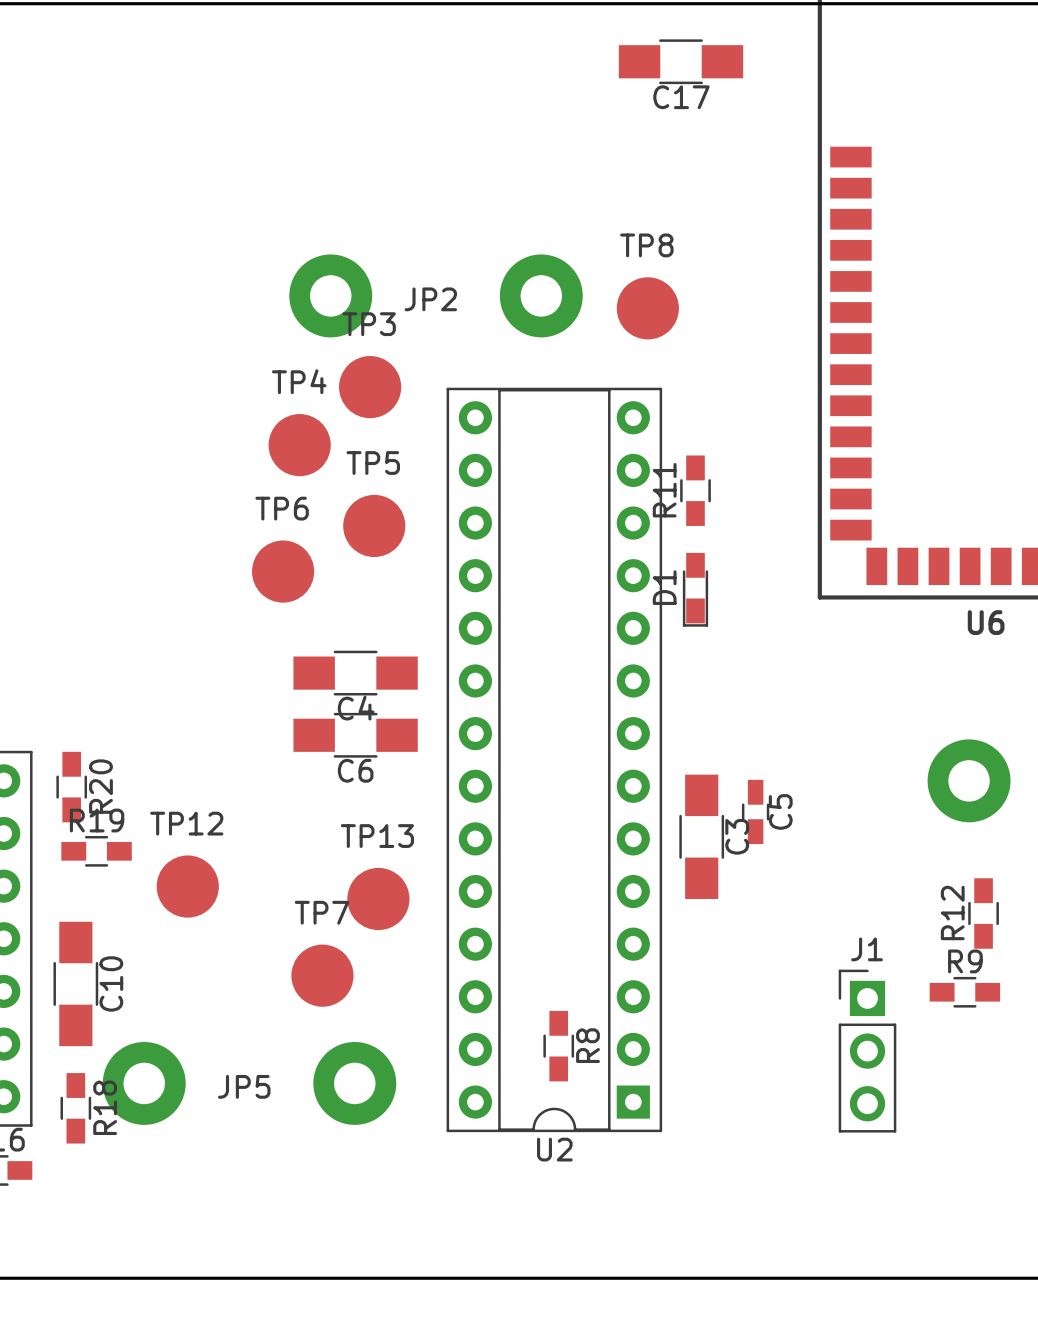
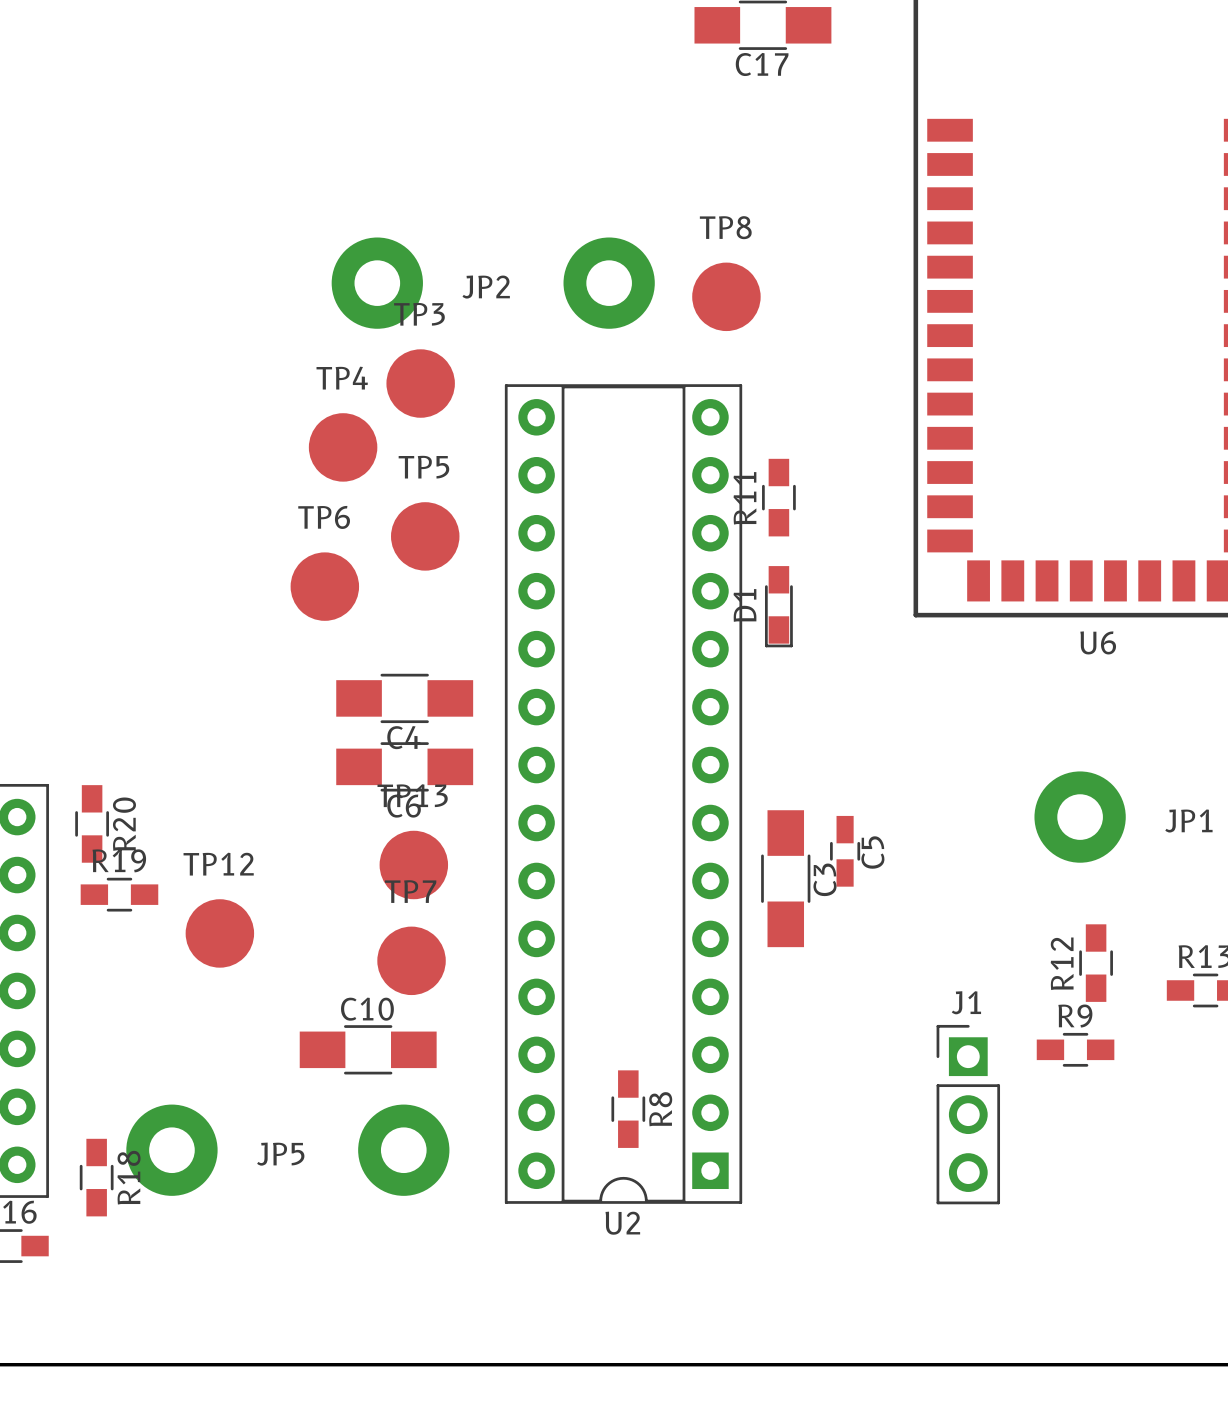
TP13 position: (378, 898) -> (413, 864)
TP7 position: (322, 975) -> (411, 960)
C10 rotation: 0° (75, 983) -> 90° clockwise (368, 1049)
C10 position: (75, 983) -> (368, 1049)
C10 name position: C10 (111, 983) -> C10 (367, 1009)

